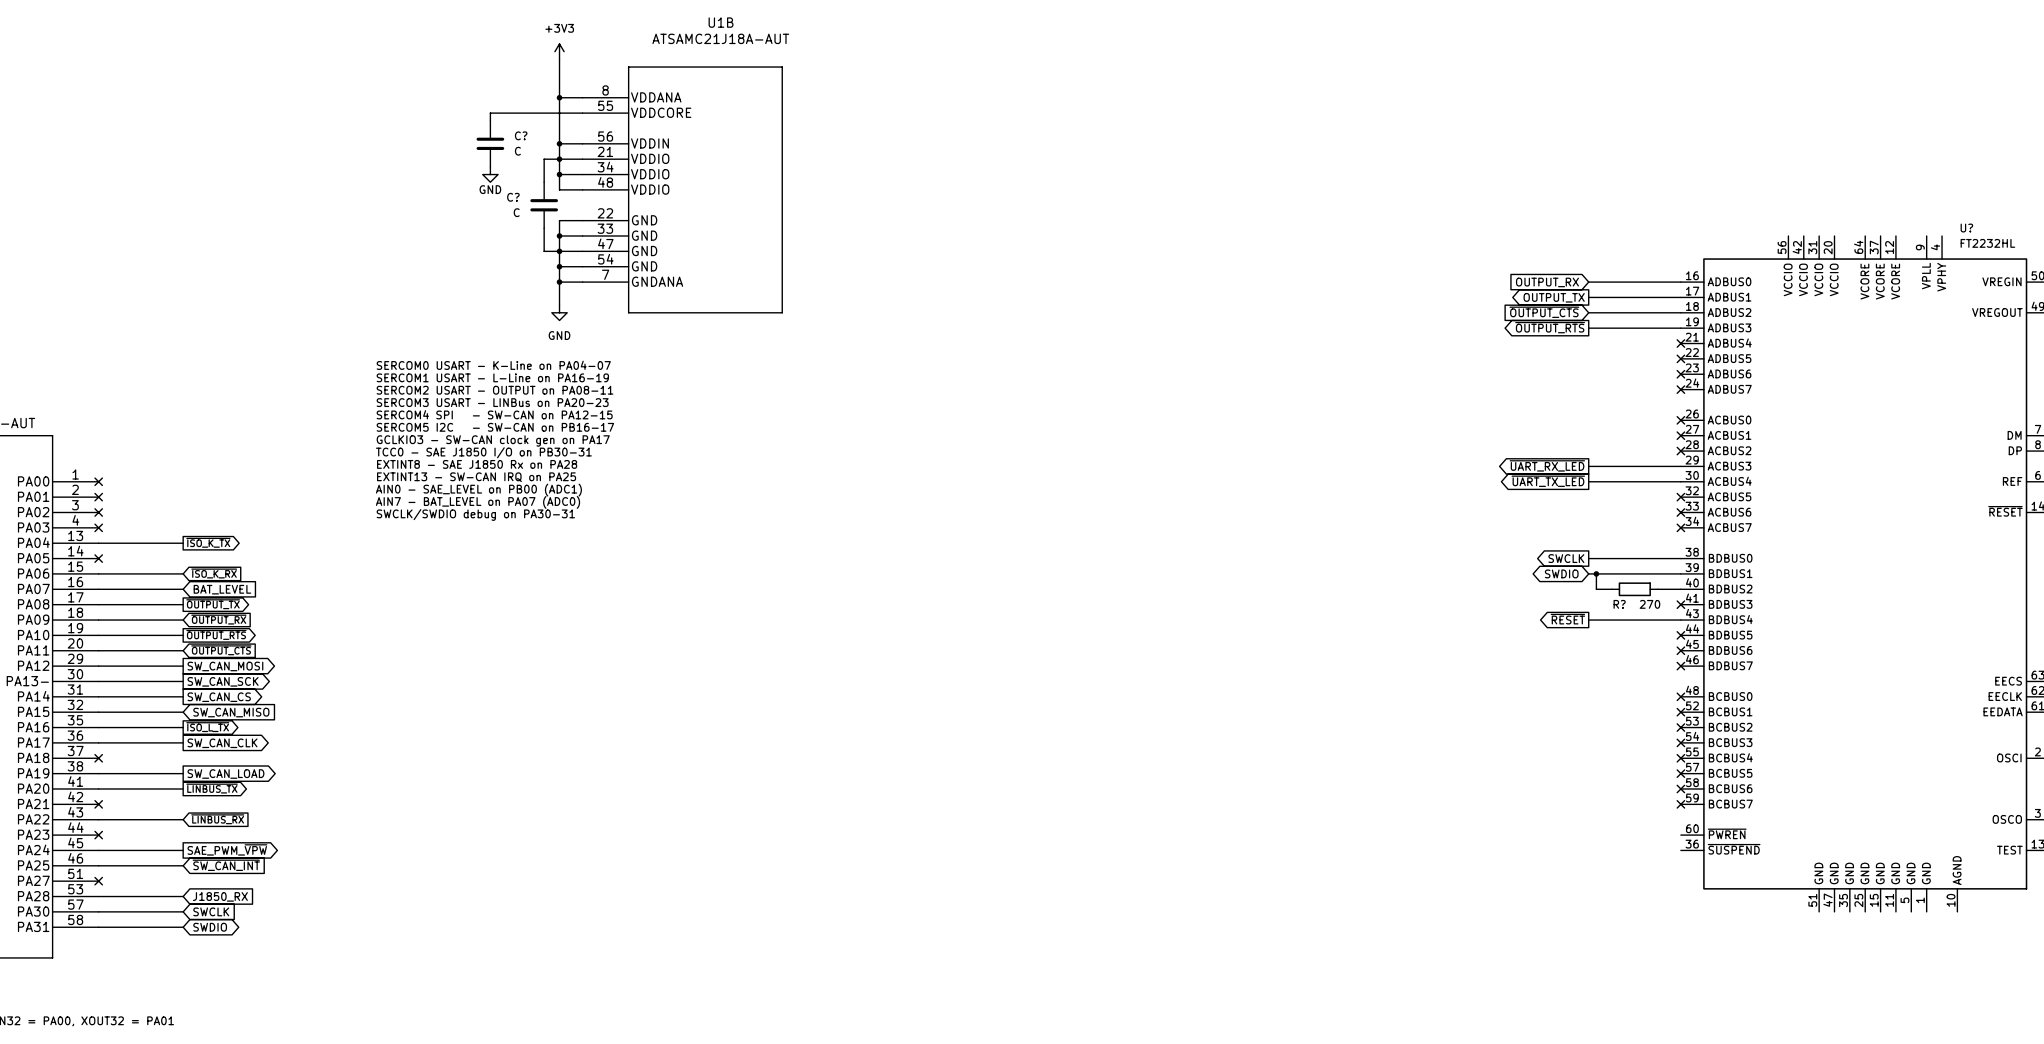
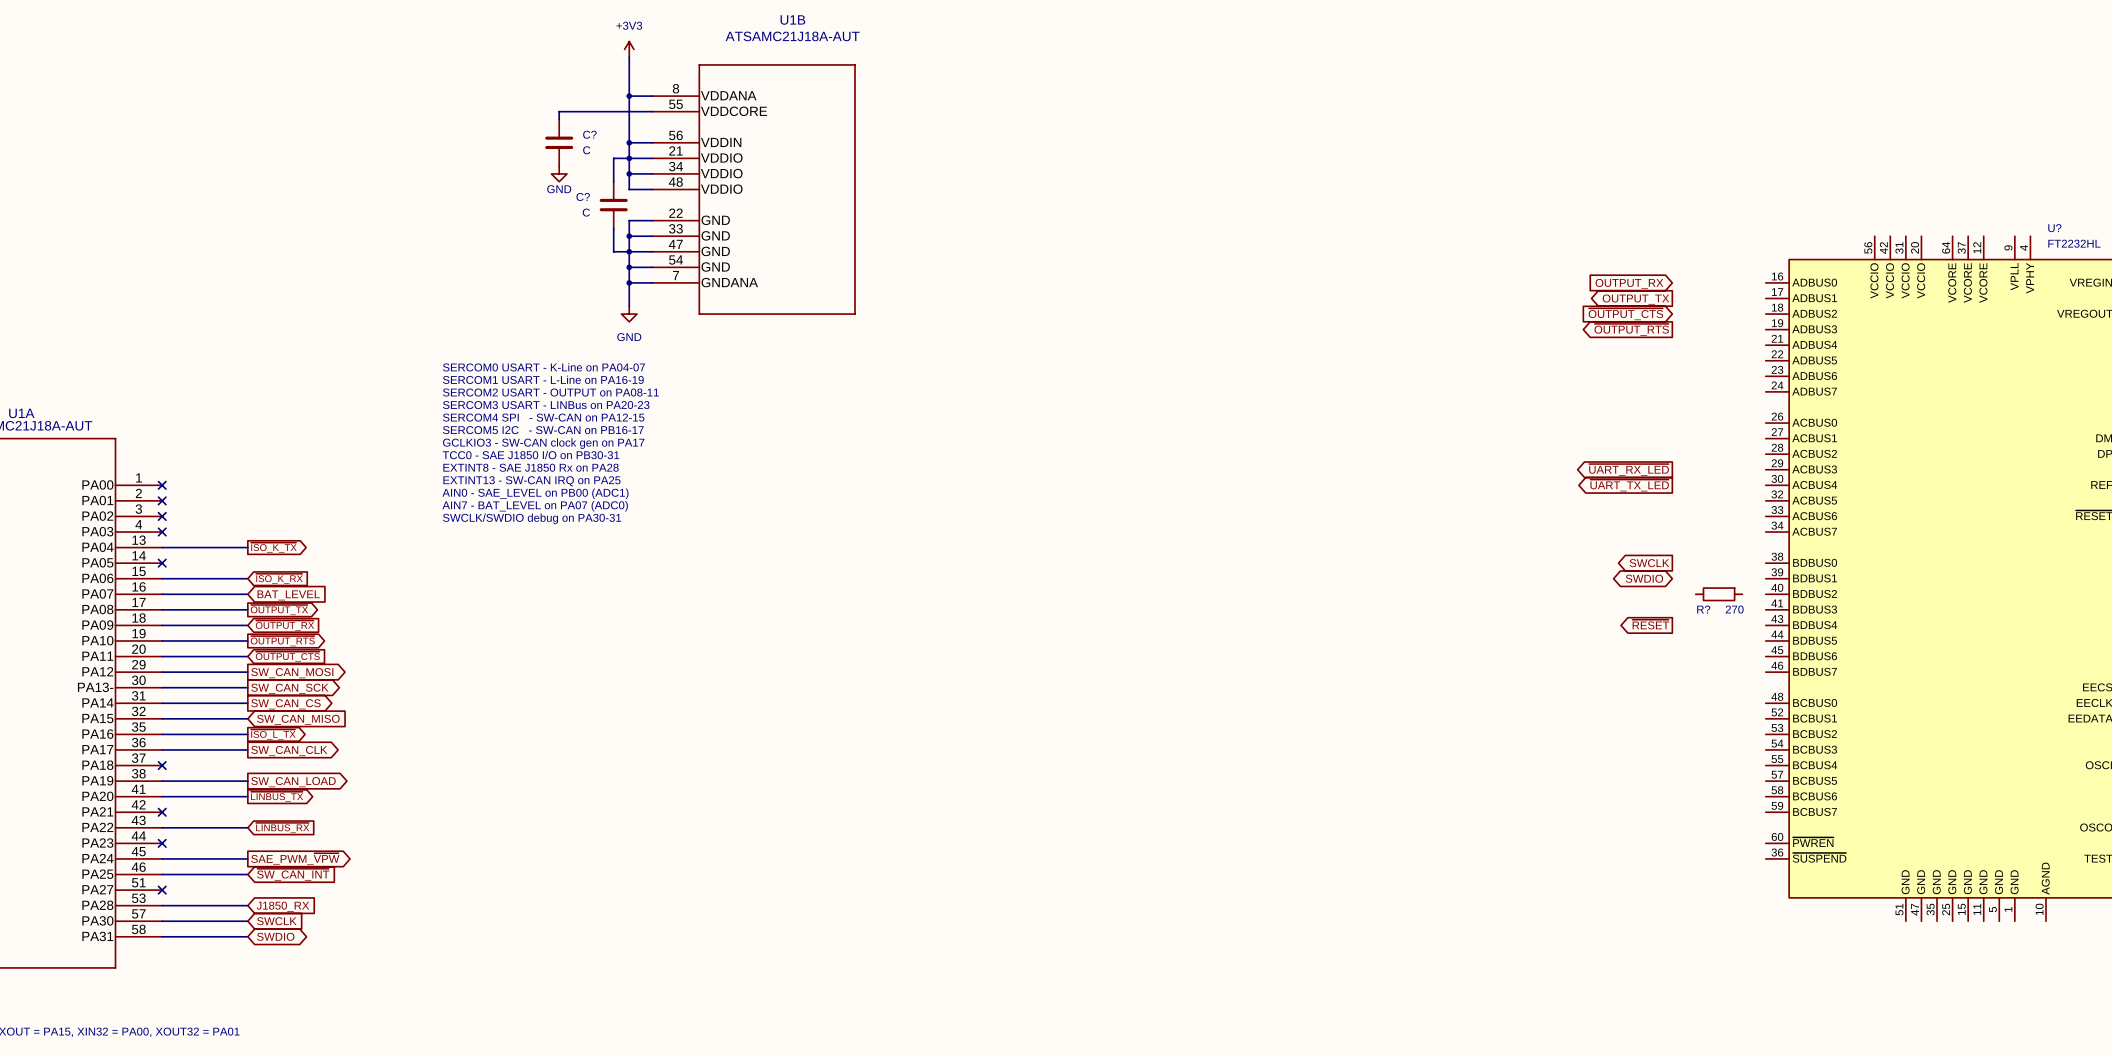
wire: (1588, 282) (1680, 282) -> none
wire: (1588, 297) (1680, 297) -> none
wire: (1588, 312) (1680, 312) -> none
wire: (1588, 328) (1680, 328) -> none
no-connect mark: (1680, 343) -> none
no-connect mark: (1680, 358) -> none
no-connect mark: (1680, 374) -> none
no-connect mark: (1680, 389) -> none
no-connect mark: (1680, 420) -> none
no-connect mark: (1680, 435) -> none
no-connect mark: (1680, 451) -> none
wire: (1588, 466) (1680, 466) -> none
wire: (1588, 481) (1680, 481) -> none
no-connect mark: (1680, 497) -> none
no-connect mark: (1680, 512) -> none
no-connect mark: (1680, 527) -> none
wire: (1588, 558) (1680, 558) -> none
wire: (1588, 573) (1680, 573) -> none
wire: (1596, 573) (1596, 589) (1611, 589) -> none
junction: (1596, 573) -> none
wire: (1657, 589) (1680, 589) -> none
no-connect mark: (1680, 604) -> none
wire: (1588, 620) (1680, 620) -> none
no-connect mark: (1680, 635) -> none
no-connect mark: (1680, 650) -> none
no-connect mark: (1680, 666) -> none
no-connect mark: (1680, 696) -> none
no-connect mark: (1680, 712) -> none
no-connect mark: (1680, 727) -> none
no-connect mark: (1680, 742) -> none
no-connect mark: (1680, 758) -> none
no-connect mark: (1680, 773) -> none
no-connect mark: (1680, 788) -> none
no-connect mark: (1680, 804) -> none

